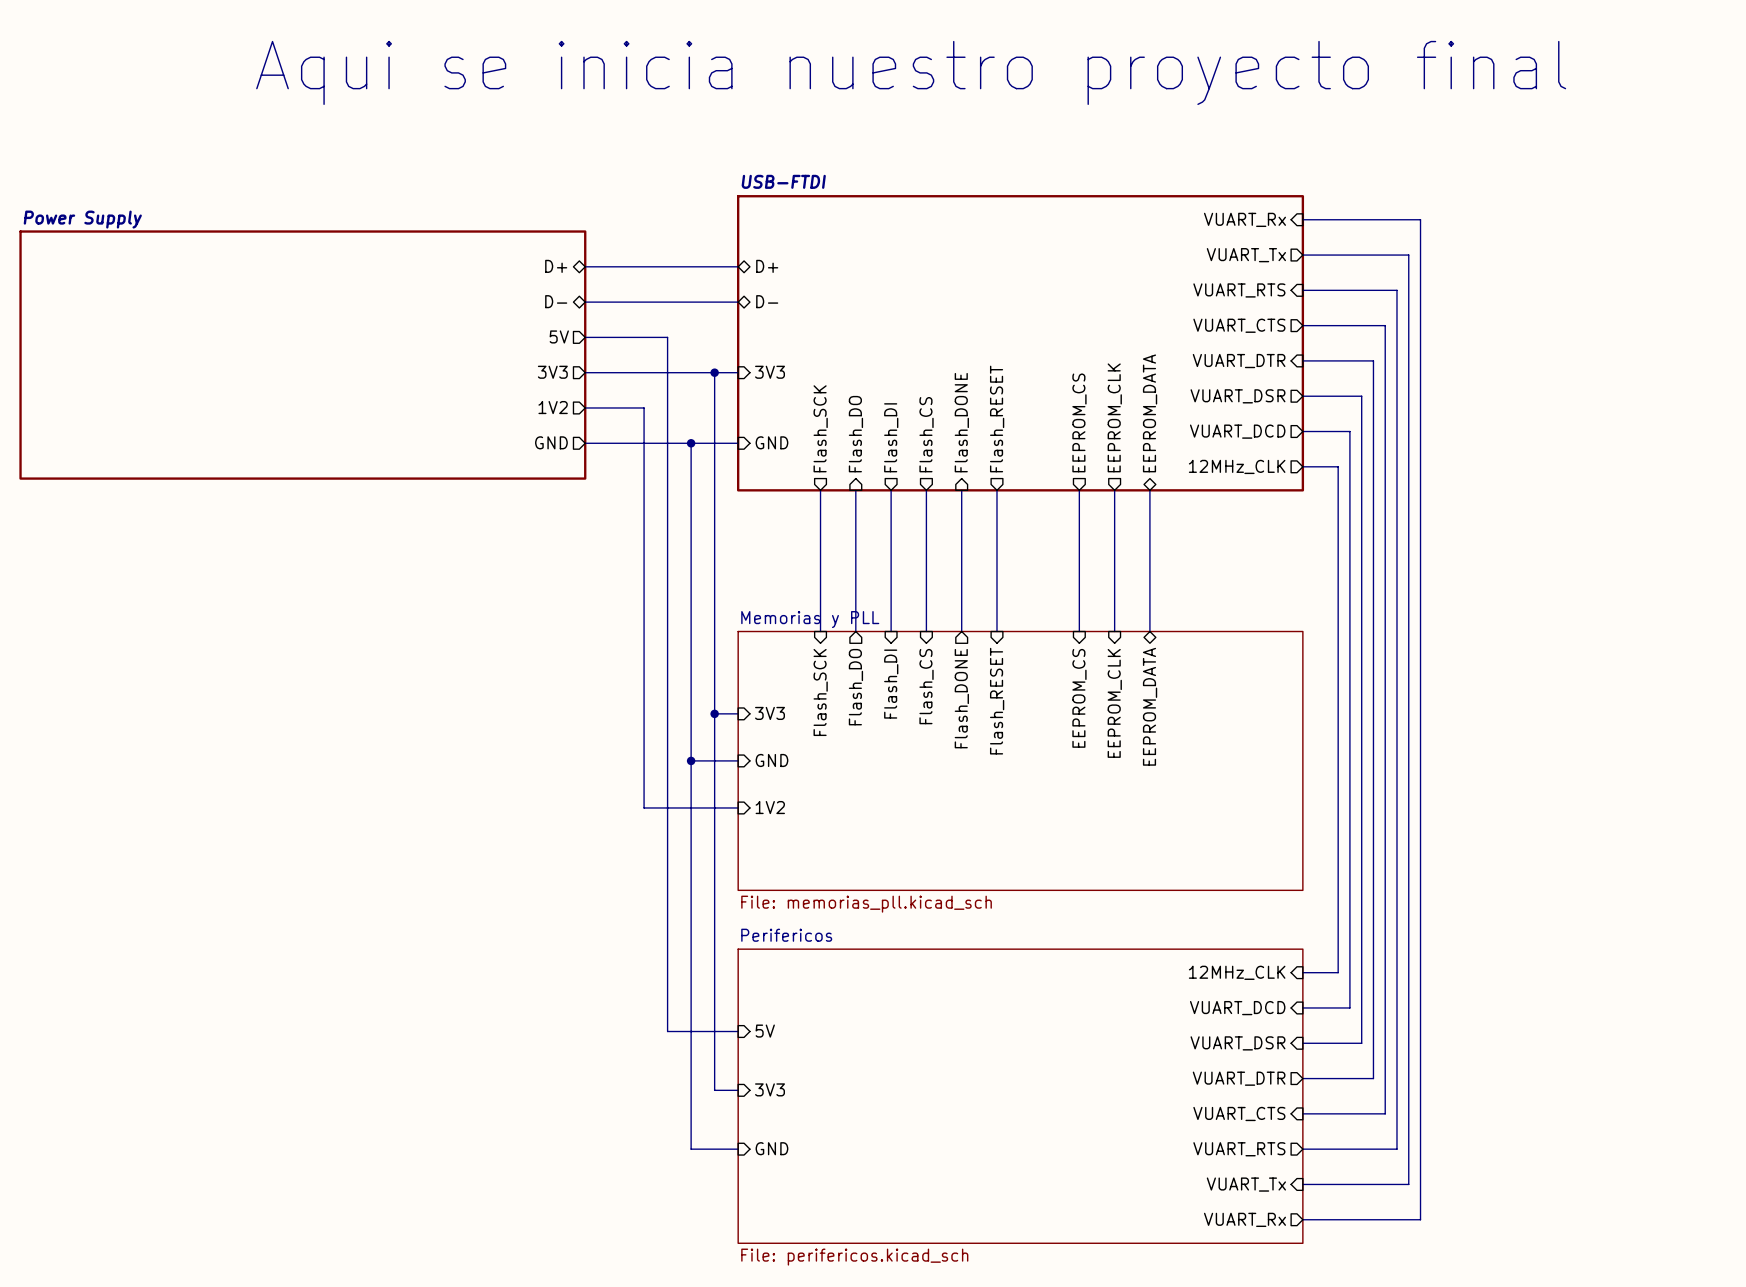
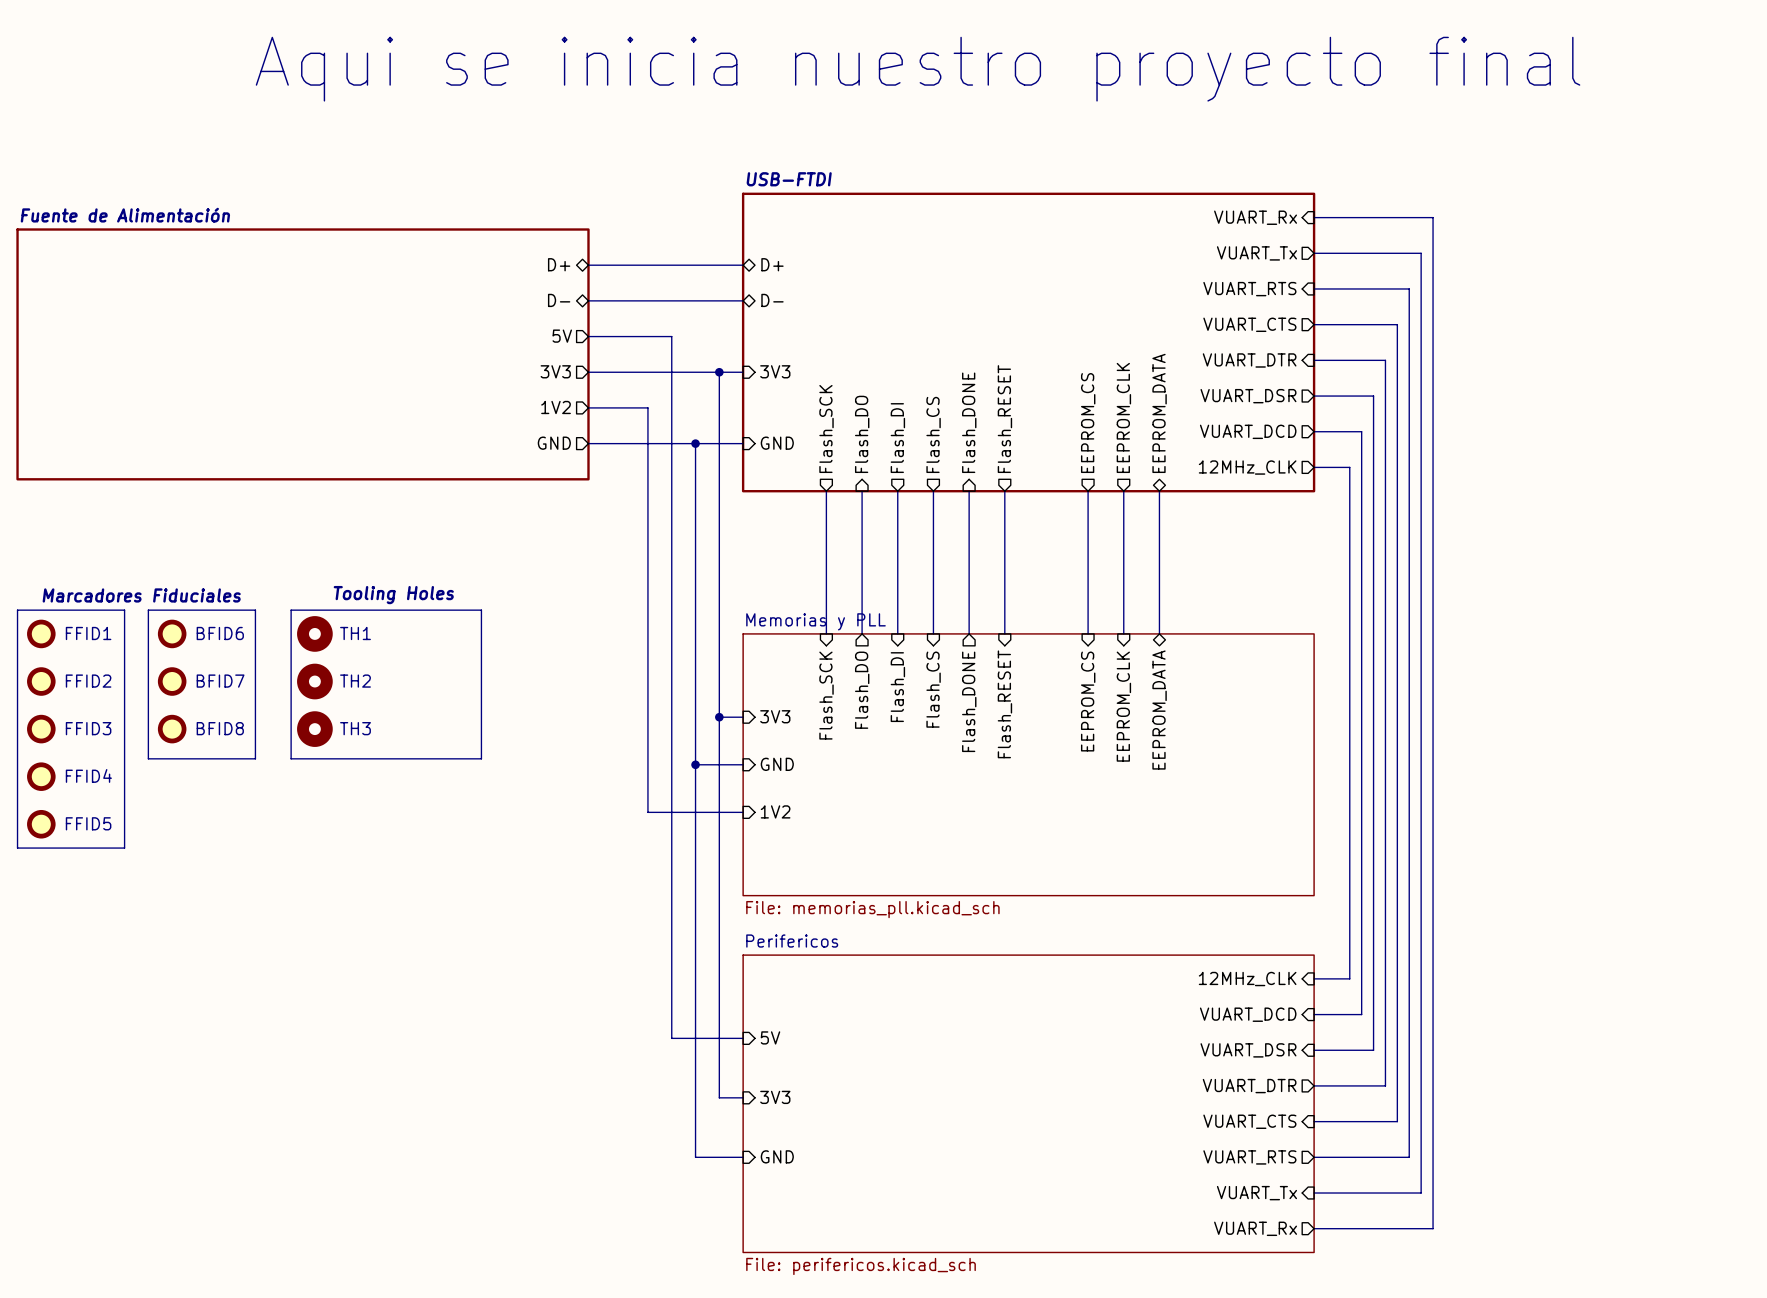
sheet Power Supply name: Power Supply (82, 219) -> Fuente de Alimentación (125, 215)
text: none -> Marcadores Fiduciales (141, 595)
text: none -> Tooling Holes (393, 595)
line: none -> (17, 610) (124, 610) (124, 848) (17, 848) (17, 610)
line: none -> (148, 610) (255, 610) (255, 758) (148, 758) (148, 610)
line: none -> (291, 610) (481, 610) (481, 758) (291, 758) (291, 610)
FFID1: none -> (41, 633)
BFID6: none -> (172, 633)
TH1: none -> (314, 633)
FFID2: none -> (41, 681)
BFID7: none -> (172, 681)
TH2: none -> (314, 681)
FFID3: none -> (41, 729)
BFID8: none -> (172, 729)
TH3: none -> (314, 729)
FFID4: none -> (41, 776)
FFID5: none -> (41, 824)

